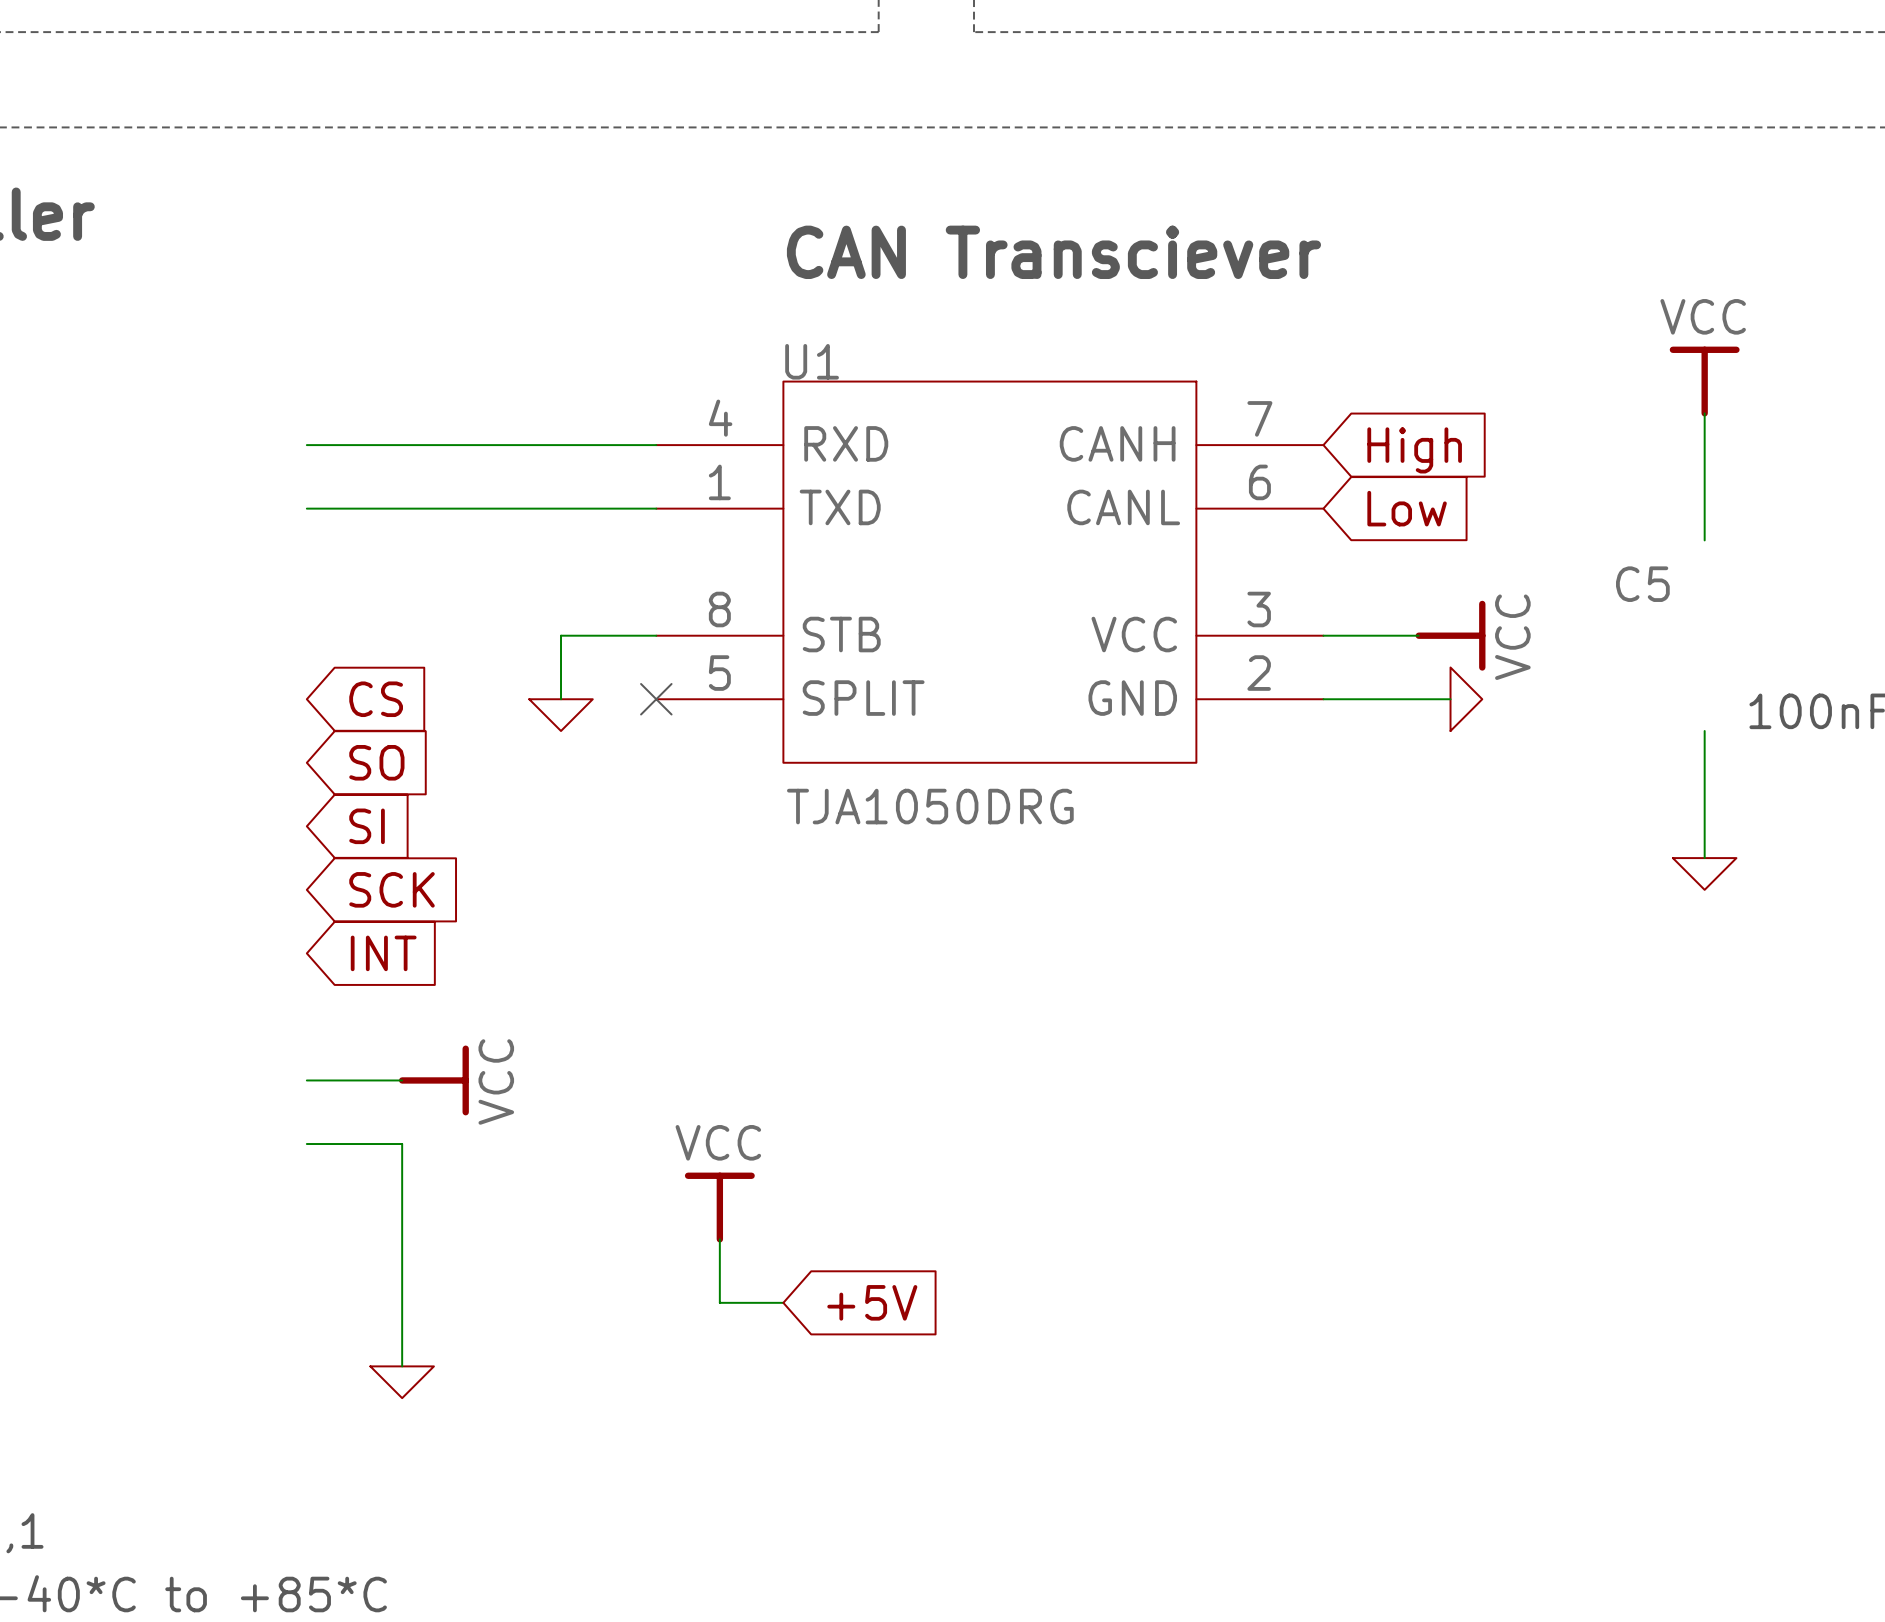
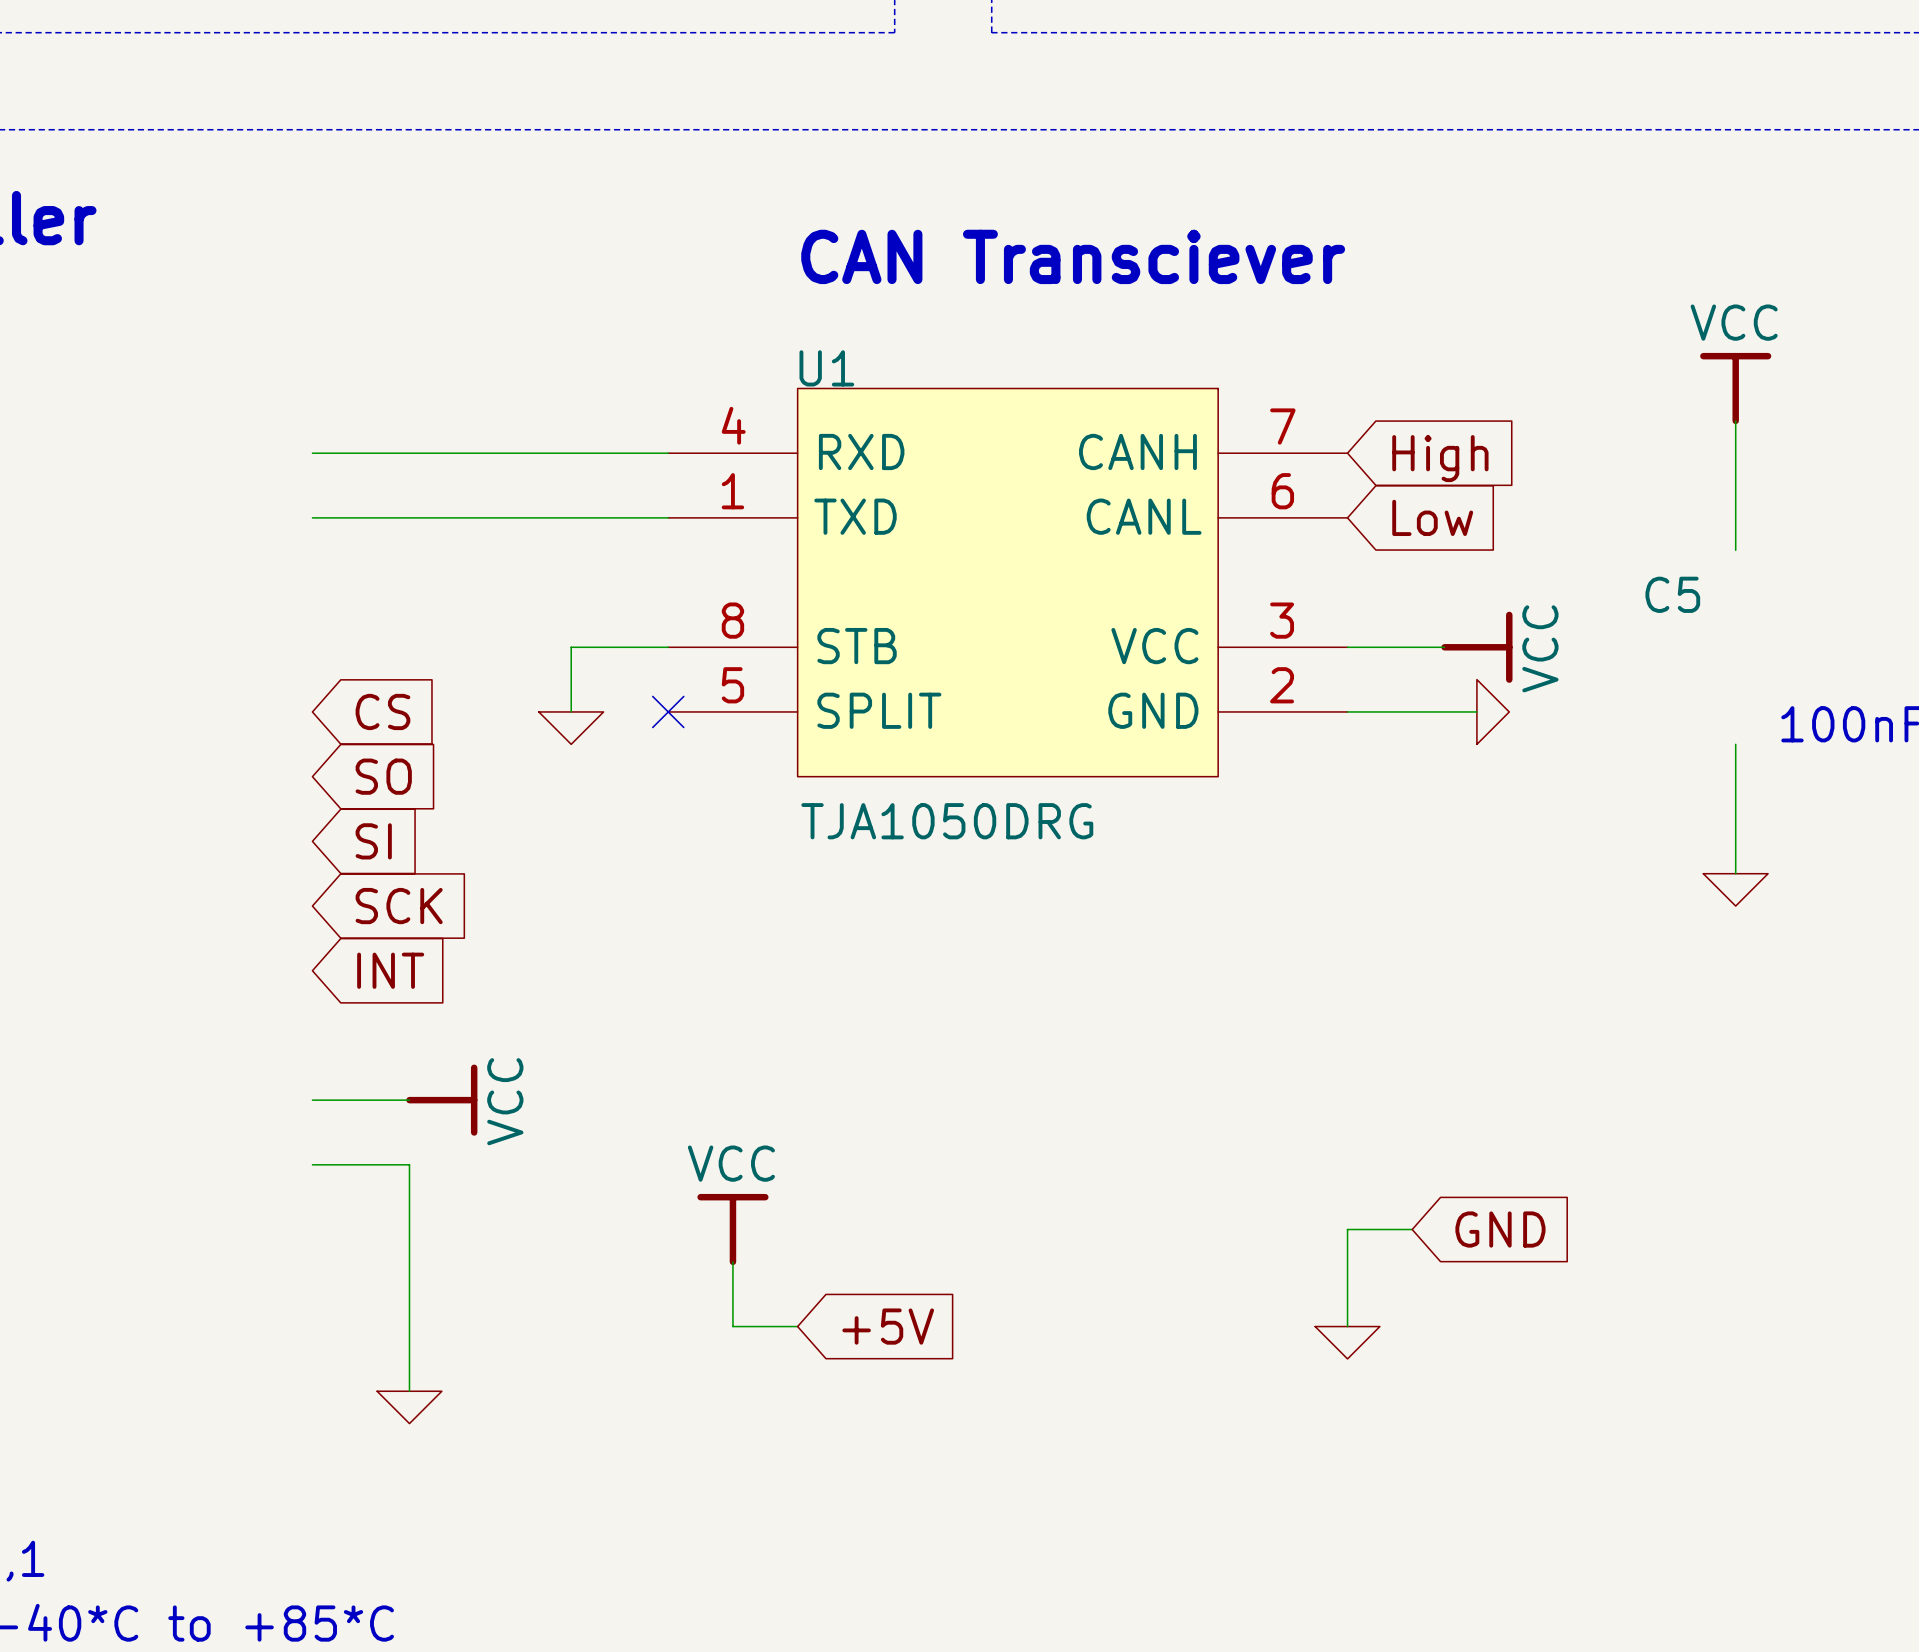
wire: none -> (1412, 1229) (1347, 1229) (1347, 1326)
global label: none -> GND (1500, 1229)
power symbol: none -> (1347, 1342)

